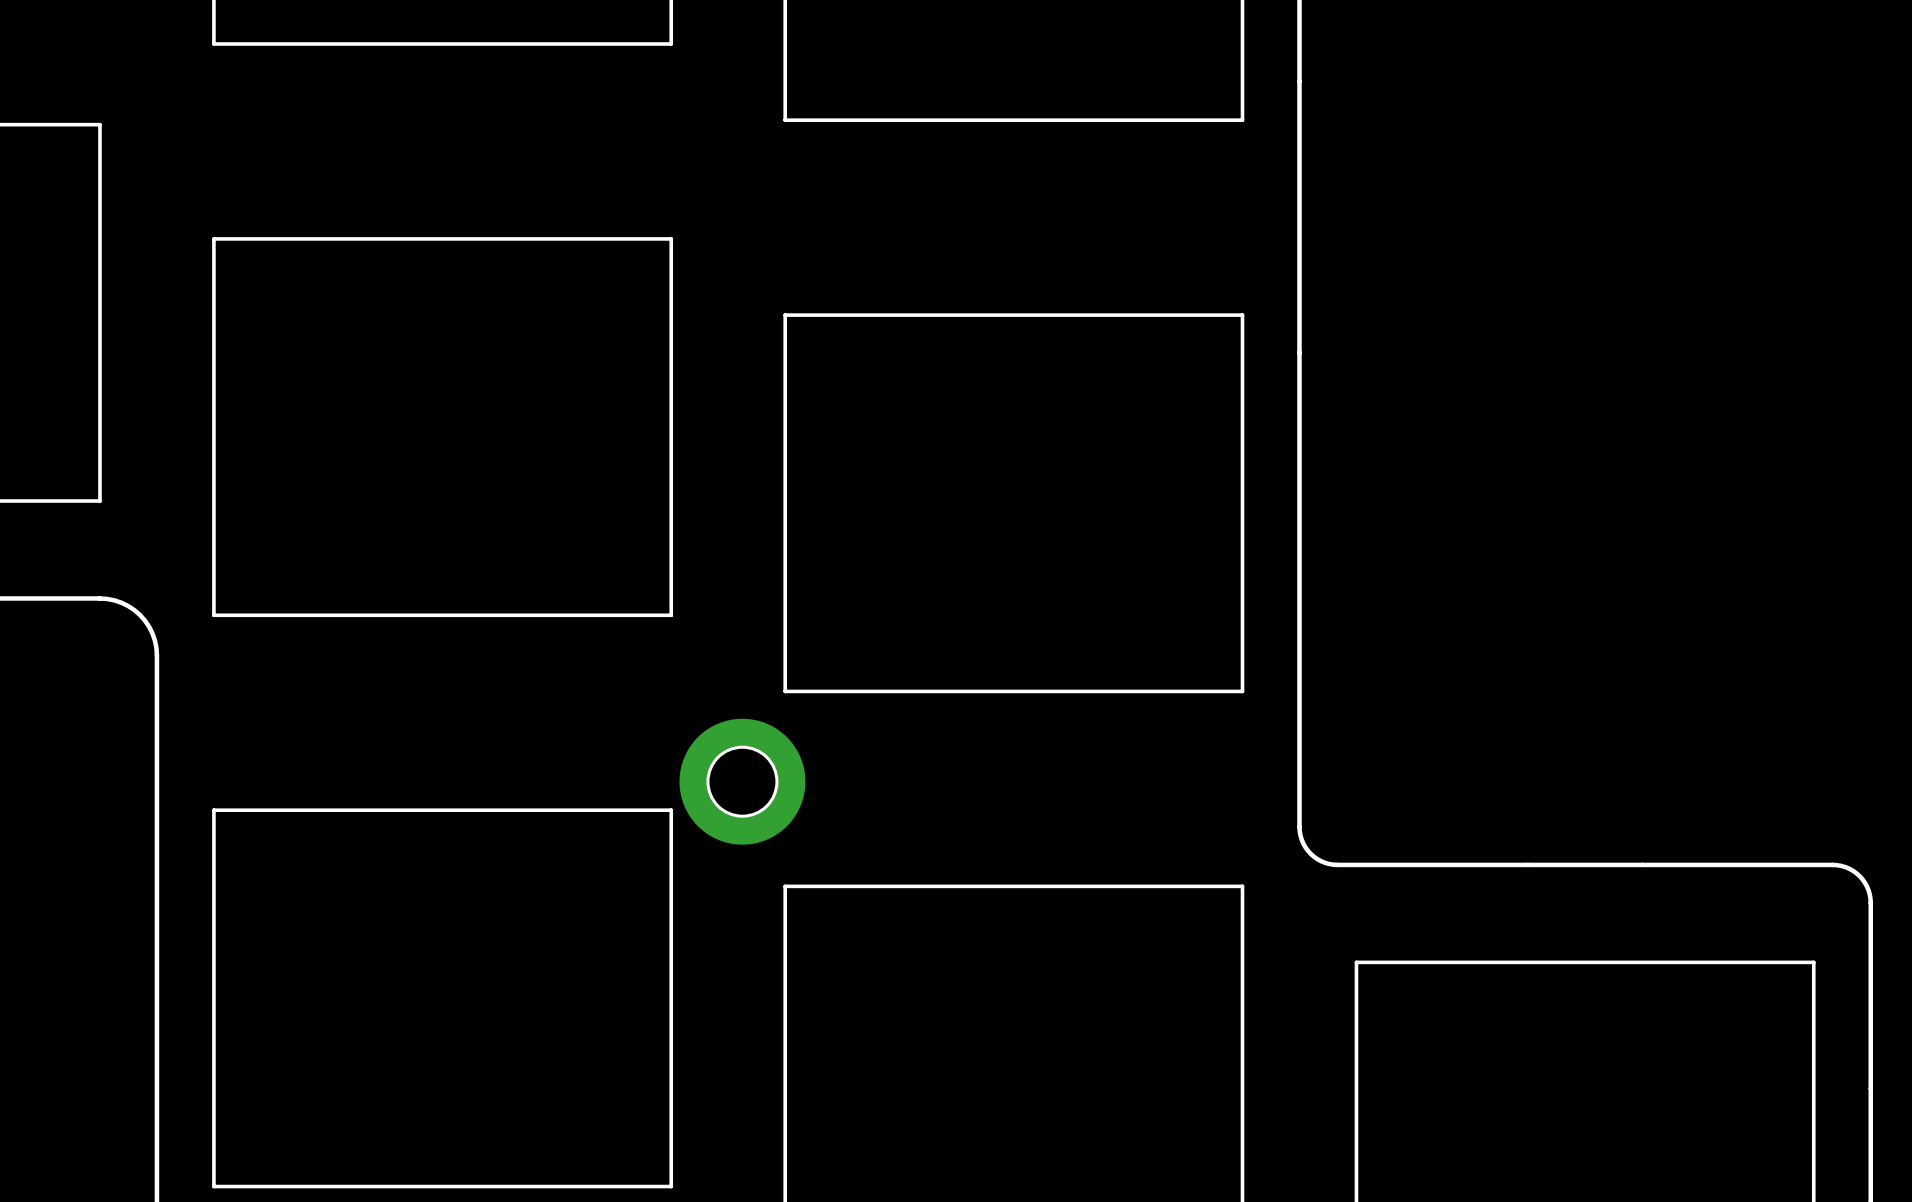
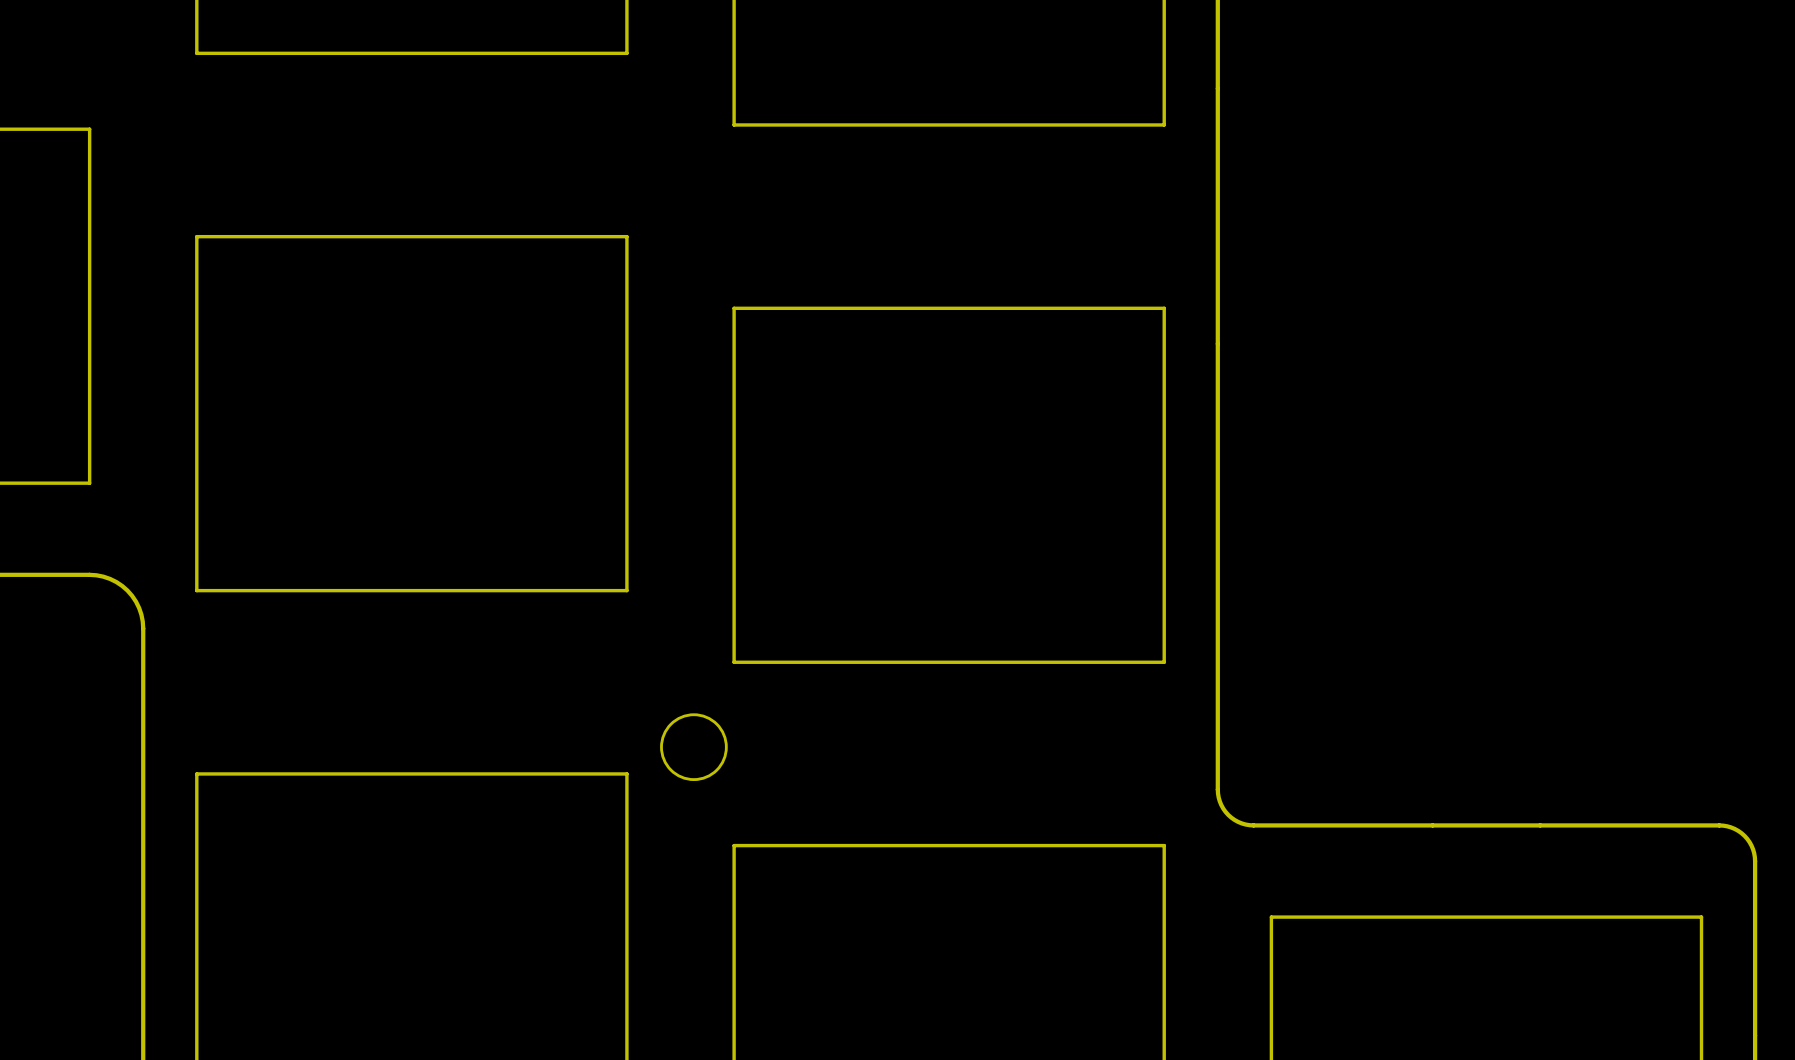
drawing: none -> [660, 713, 728, 782]
part: (742, 781) -> none

